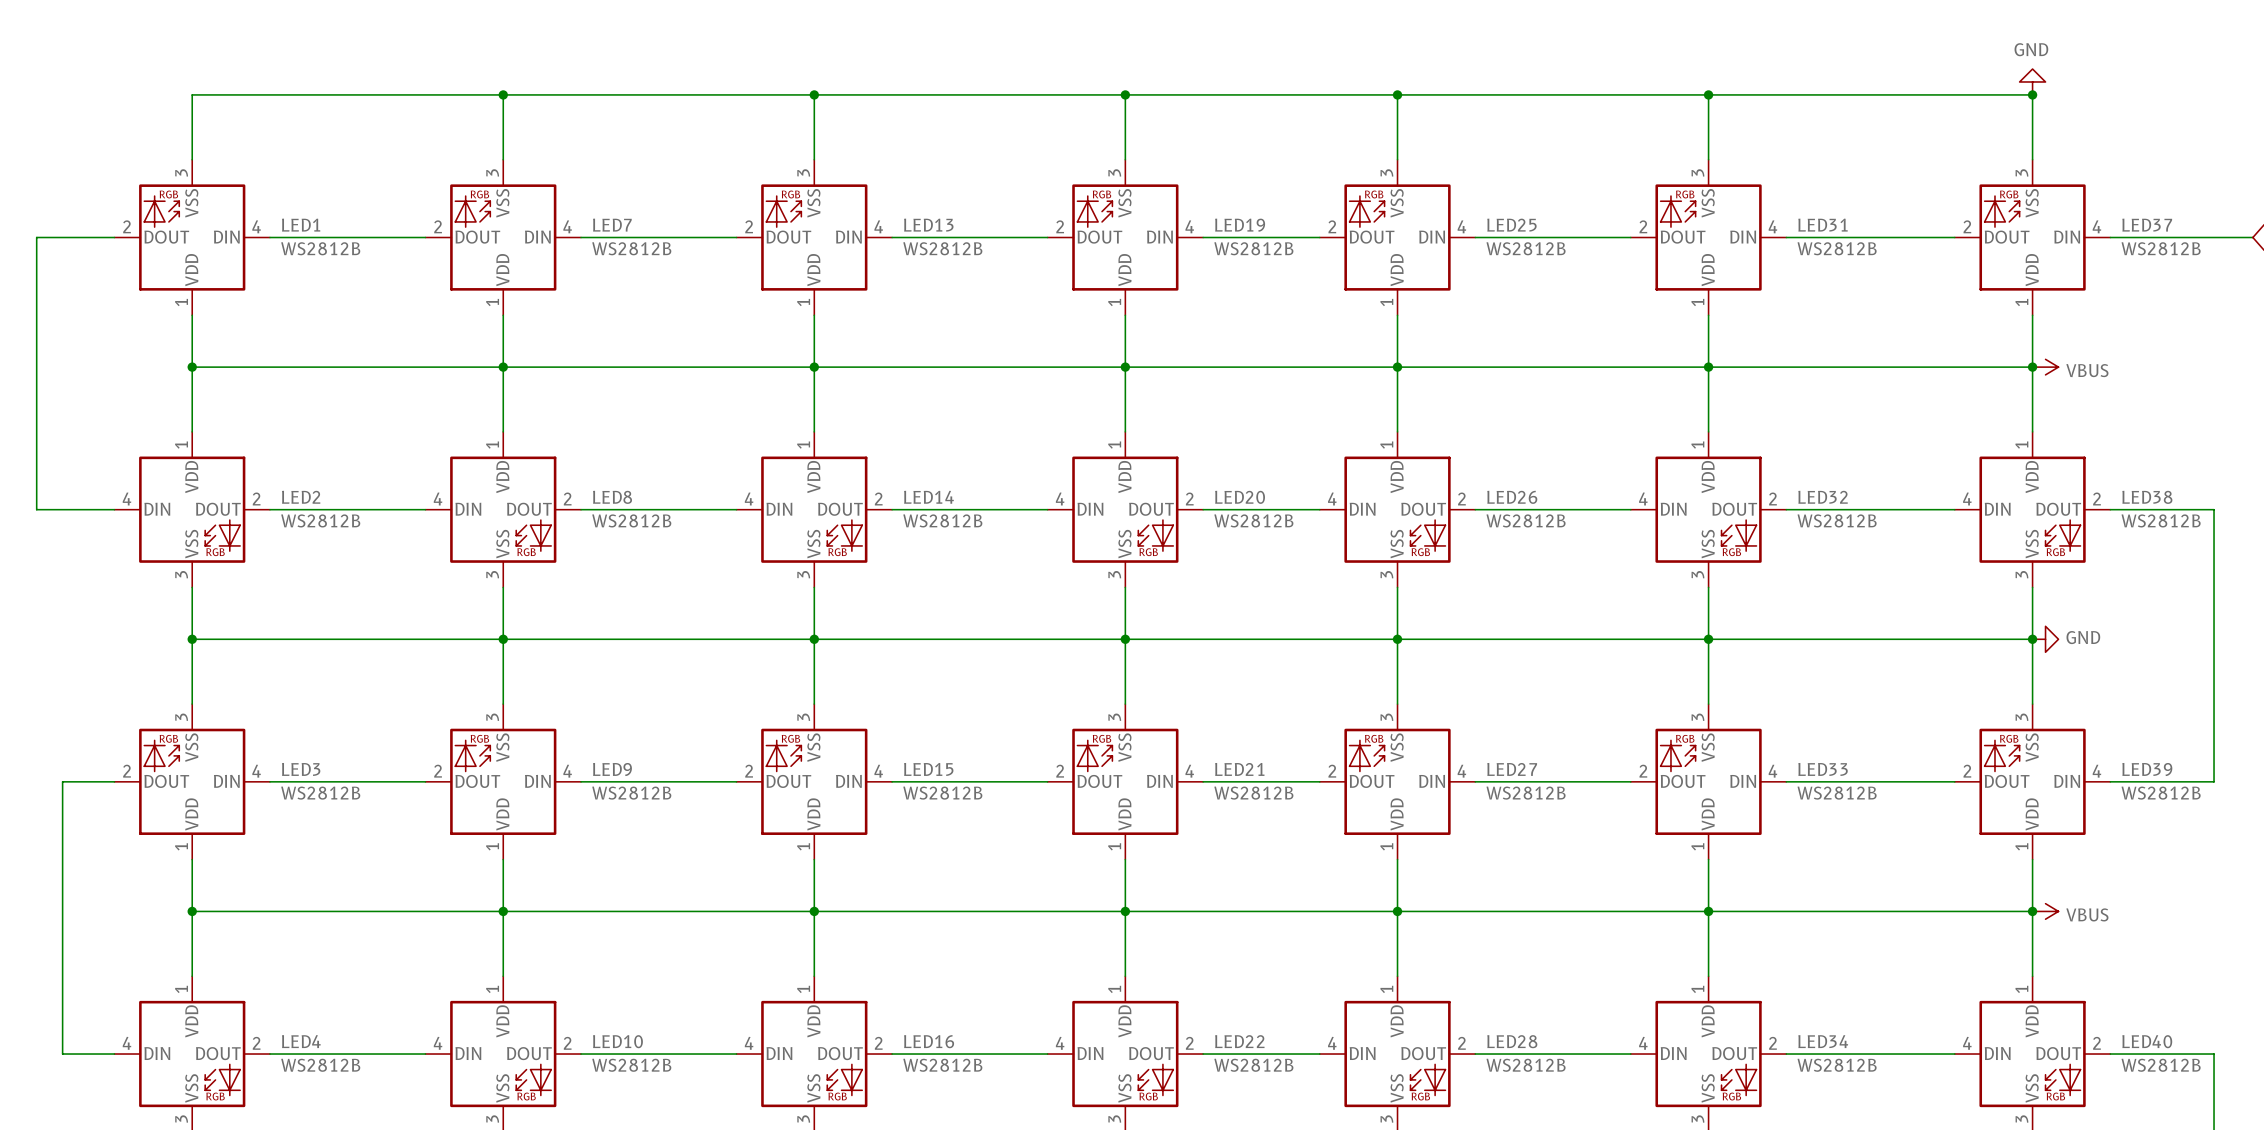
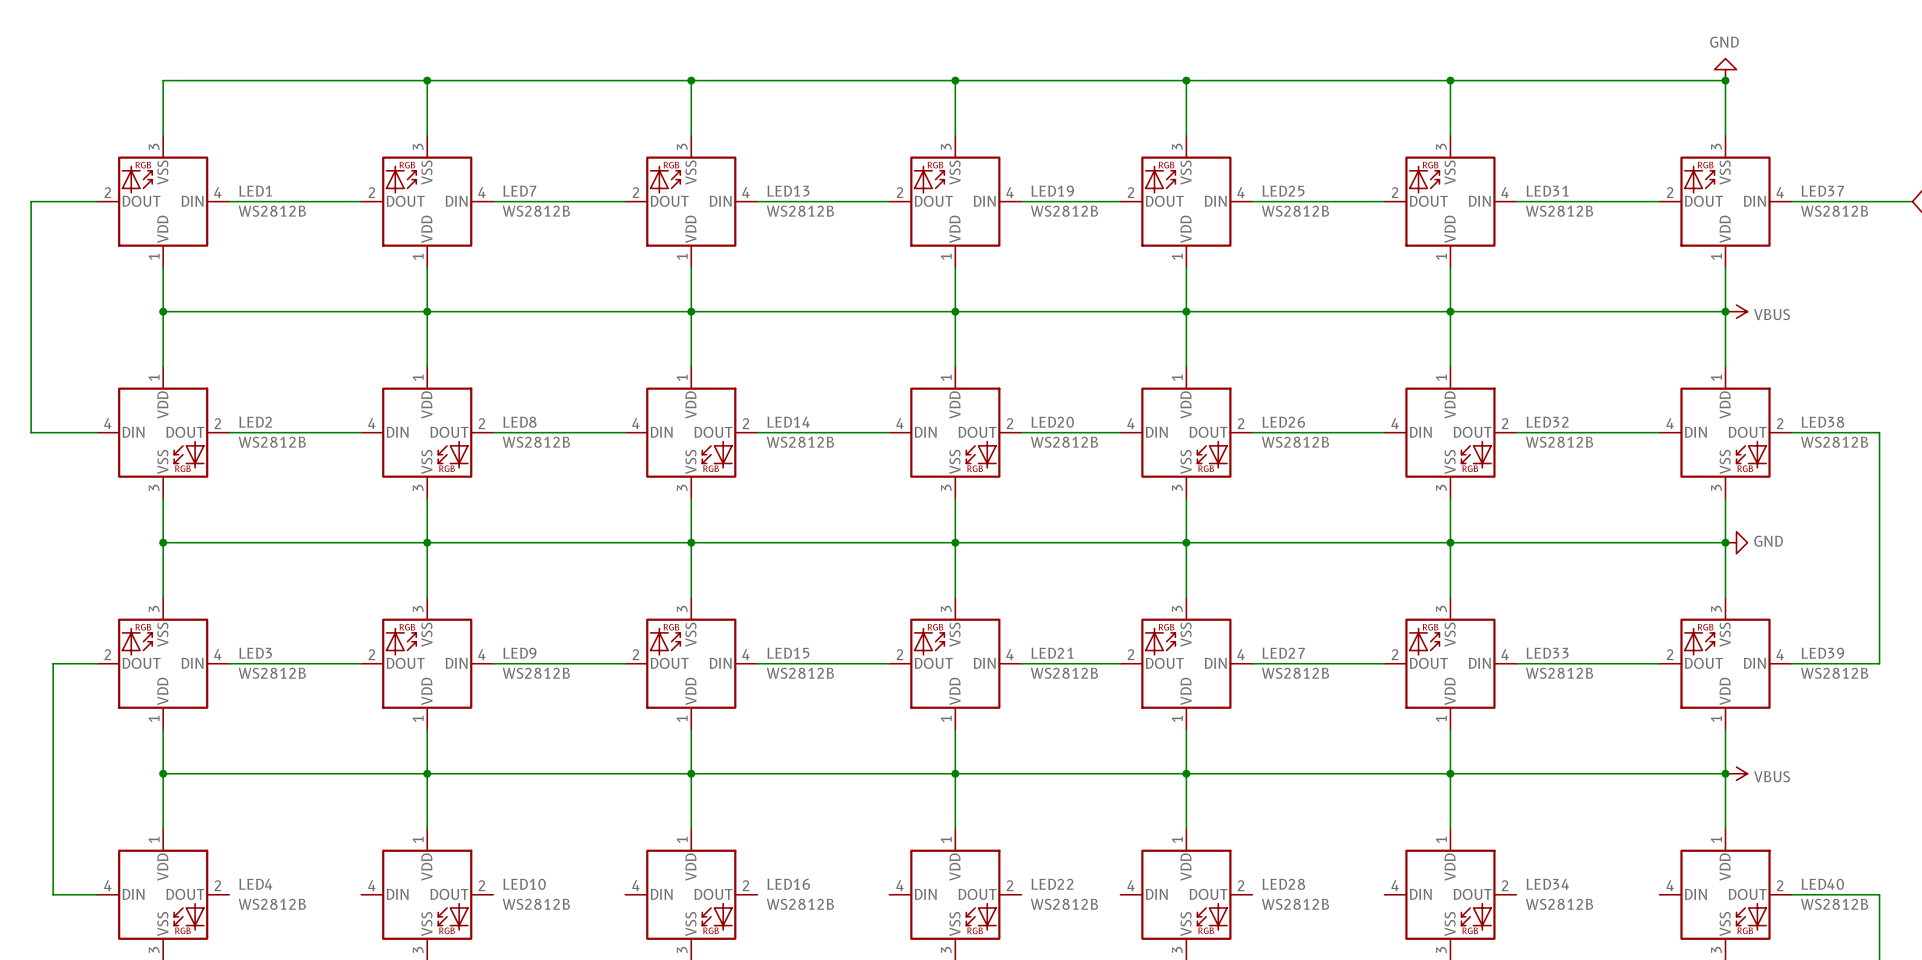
wire: (269, 1054) (425, 1054) -> none
wire: (581, 1054) (736, 1054) -> none
wire: (892, 1054) (1047, 1054) -> none
wire: (1203, 1054) (1319, 1054) -> none
wire: (1475, 1054) (1630, 1054) -> none
wire: (1786, 1054) (1954, 1054) -> none

